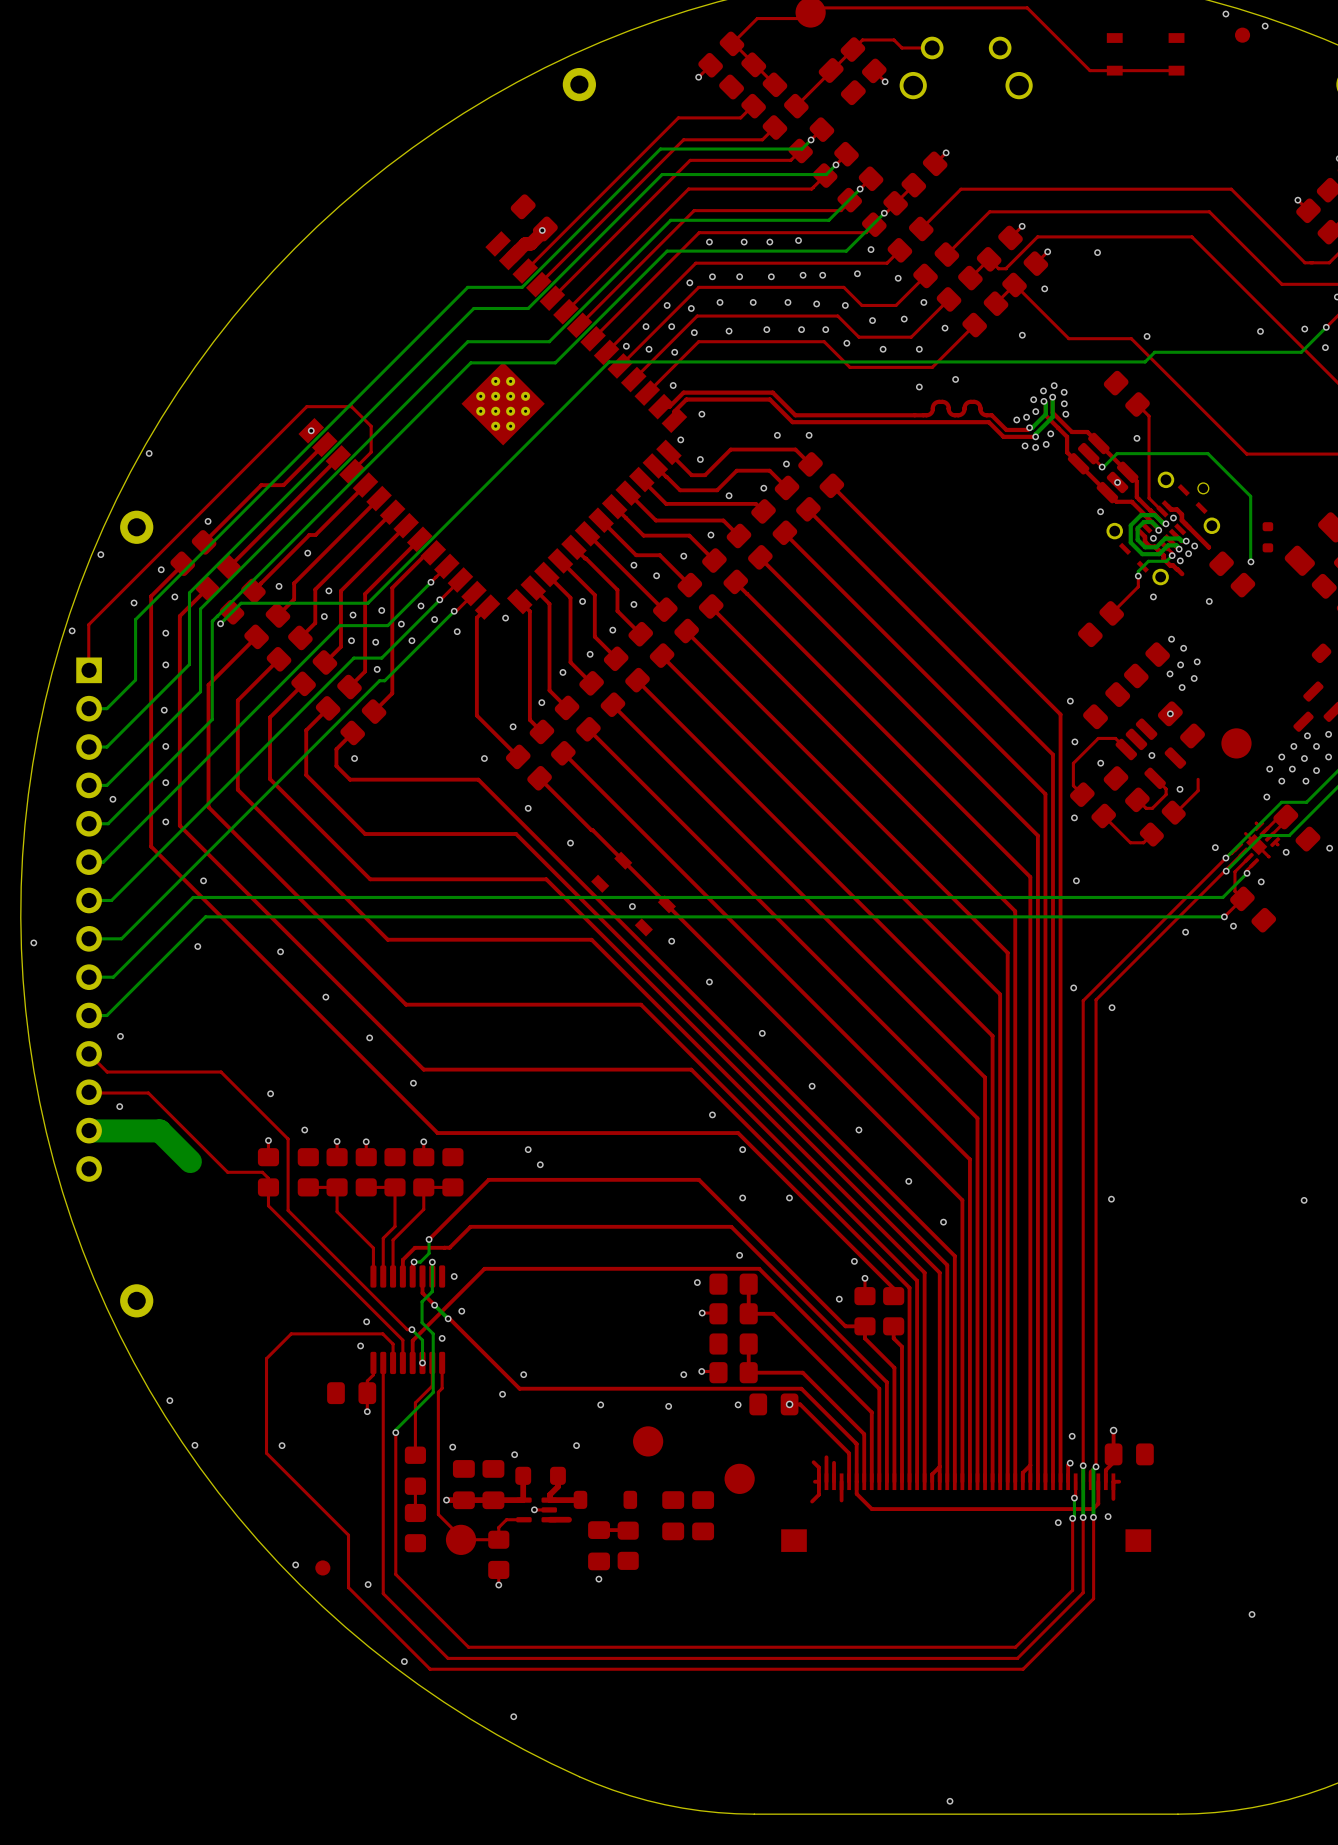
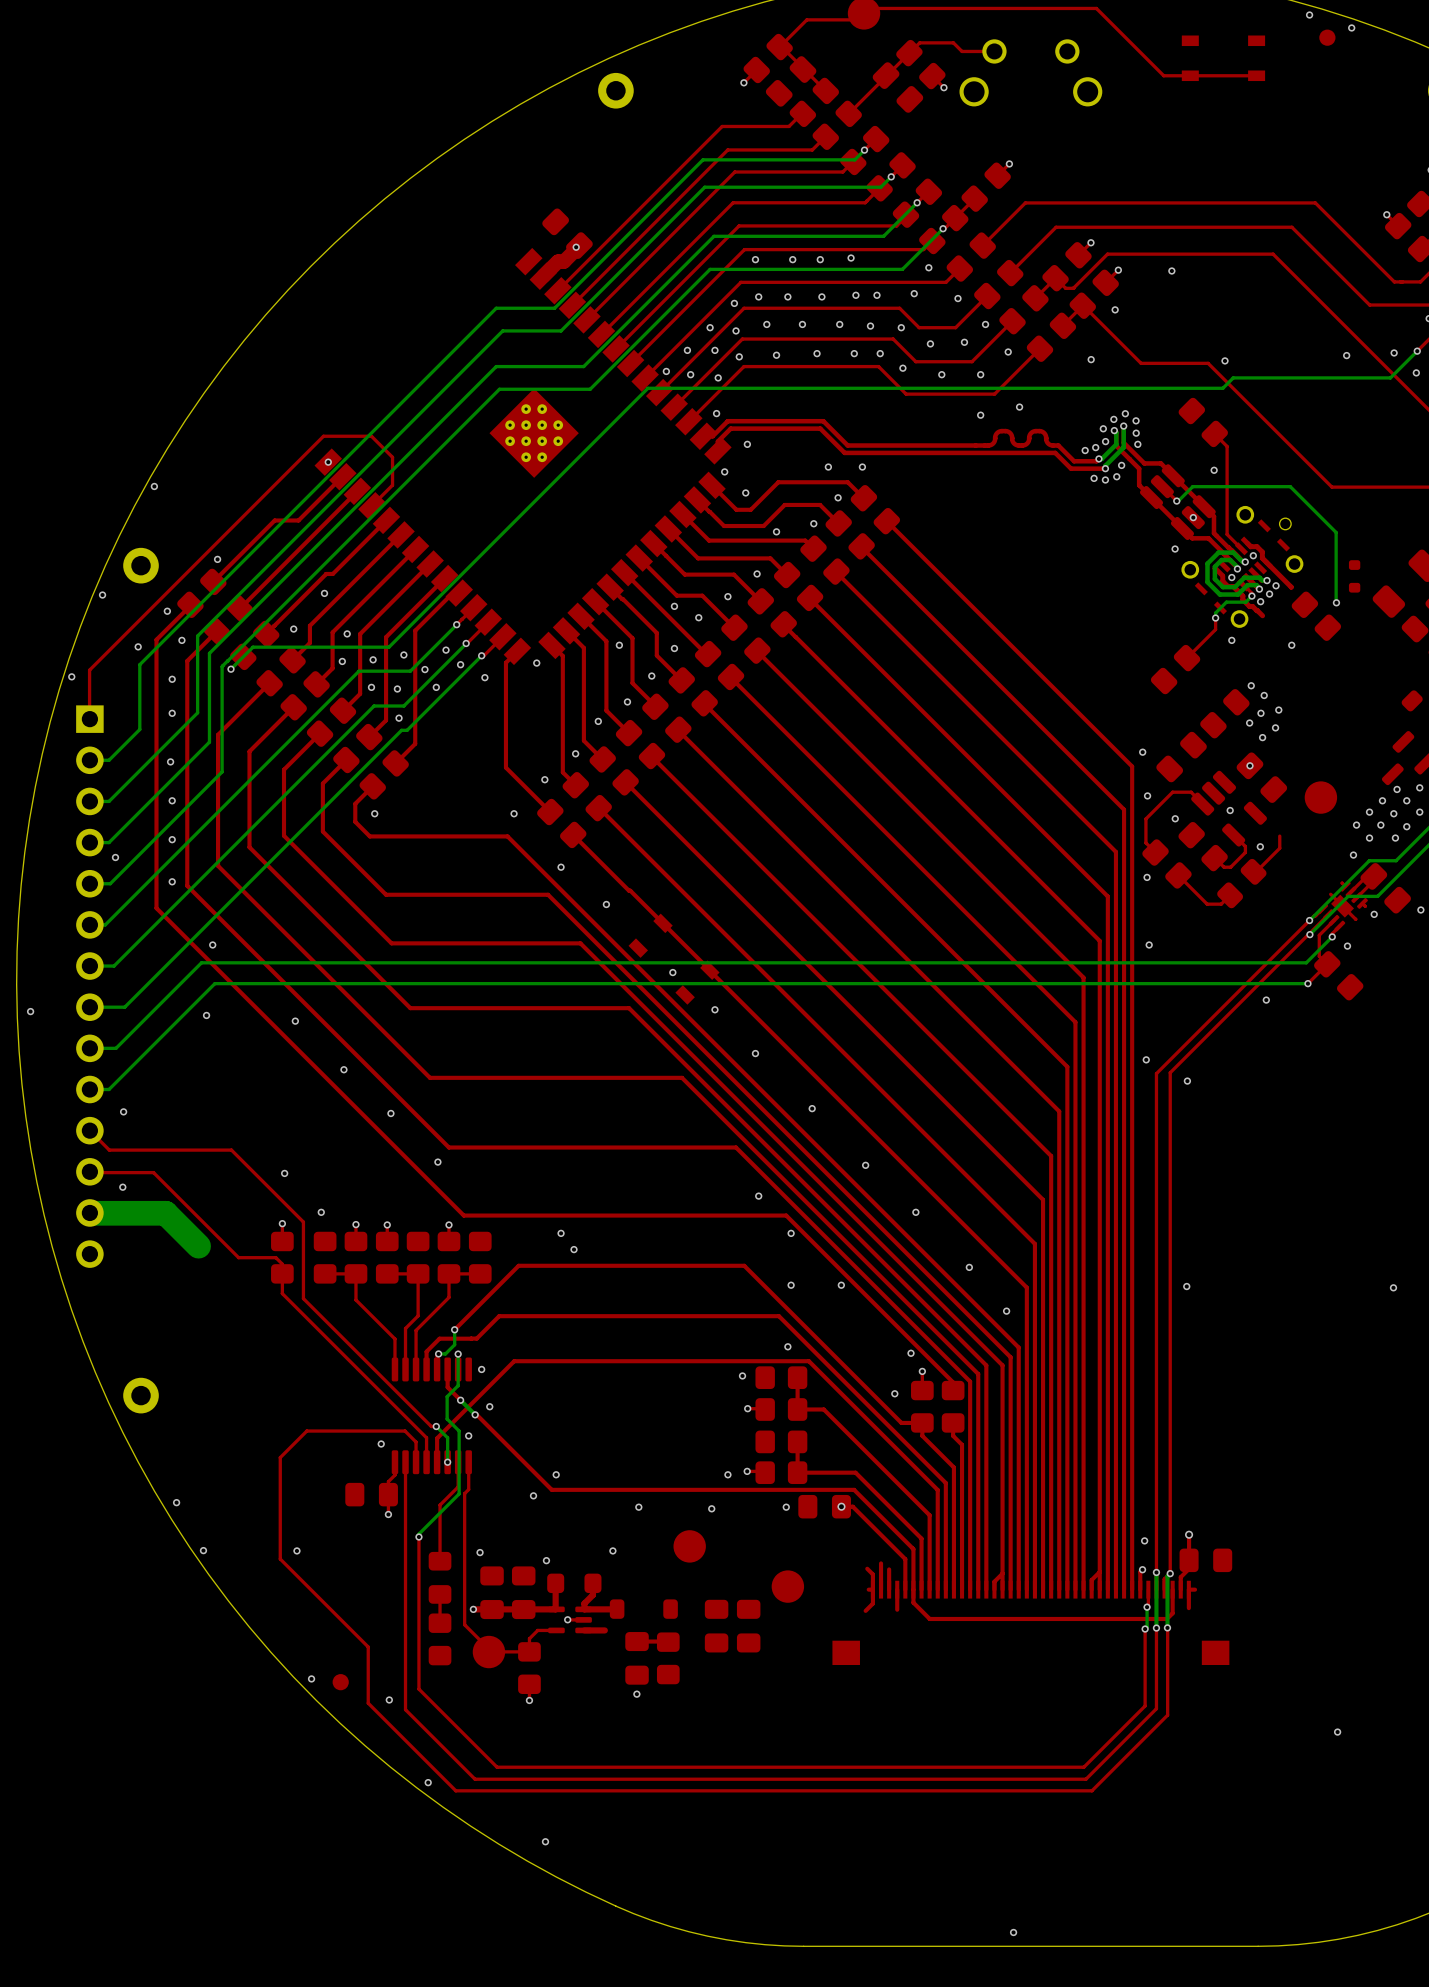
via: (1215, 847) -> none
via: (1233, 926) -> none
via: (366, 1321) -> none
via: (1108, 1516) -> none
via: (1058, 1522) -> none

